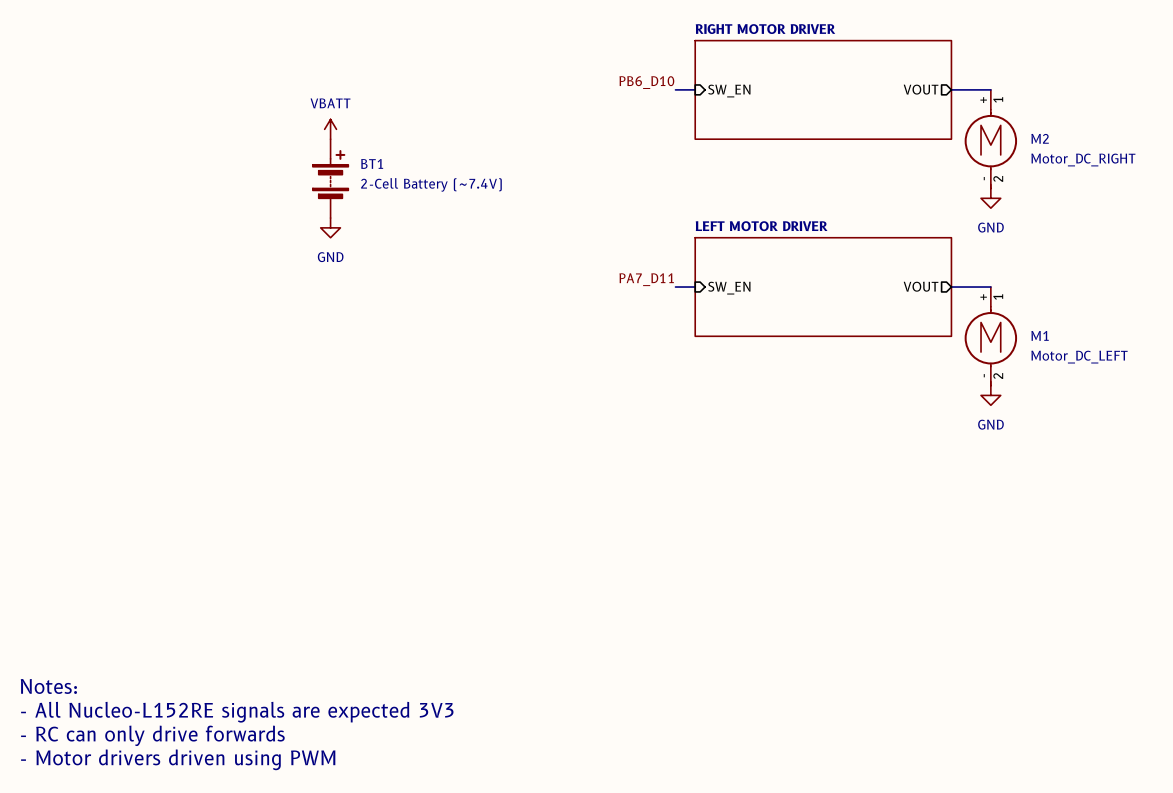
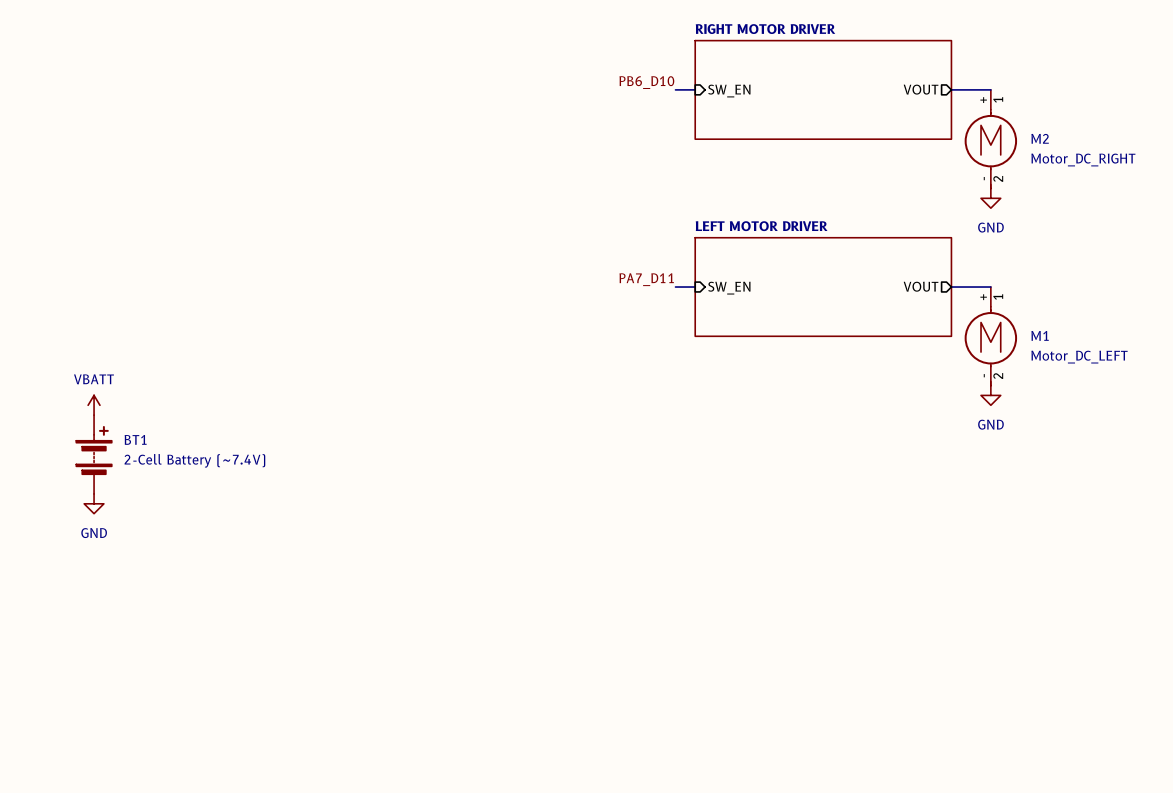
power symbol: VBATT (330, 129) -> none
BT1 position: (330, 178) -> (94, 454)
power symbol: GND (330, 227) -> none
power symbol: none -> VBATT (94, 405)
power symbol: none -> GND (94, 503)
text: Notes: (48, 686) -> none
text: - All Nucleo-L152RE signals are expected 3V3 (237, 712) -> none
text: - RC can only drive forwards (152, 735) -> none
text: - Motor drivers driven using PWM (178, 759) -> none

